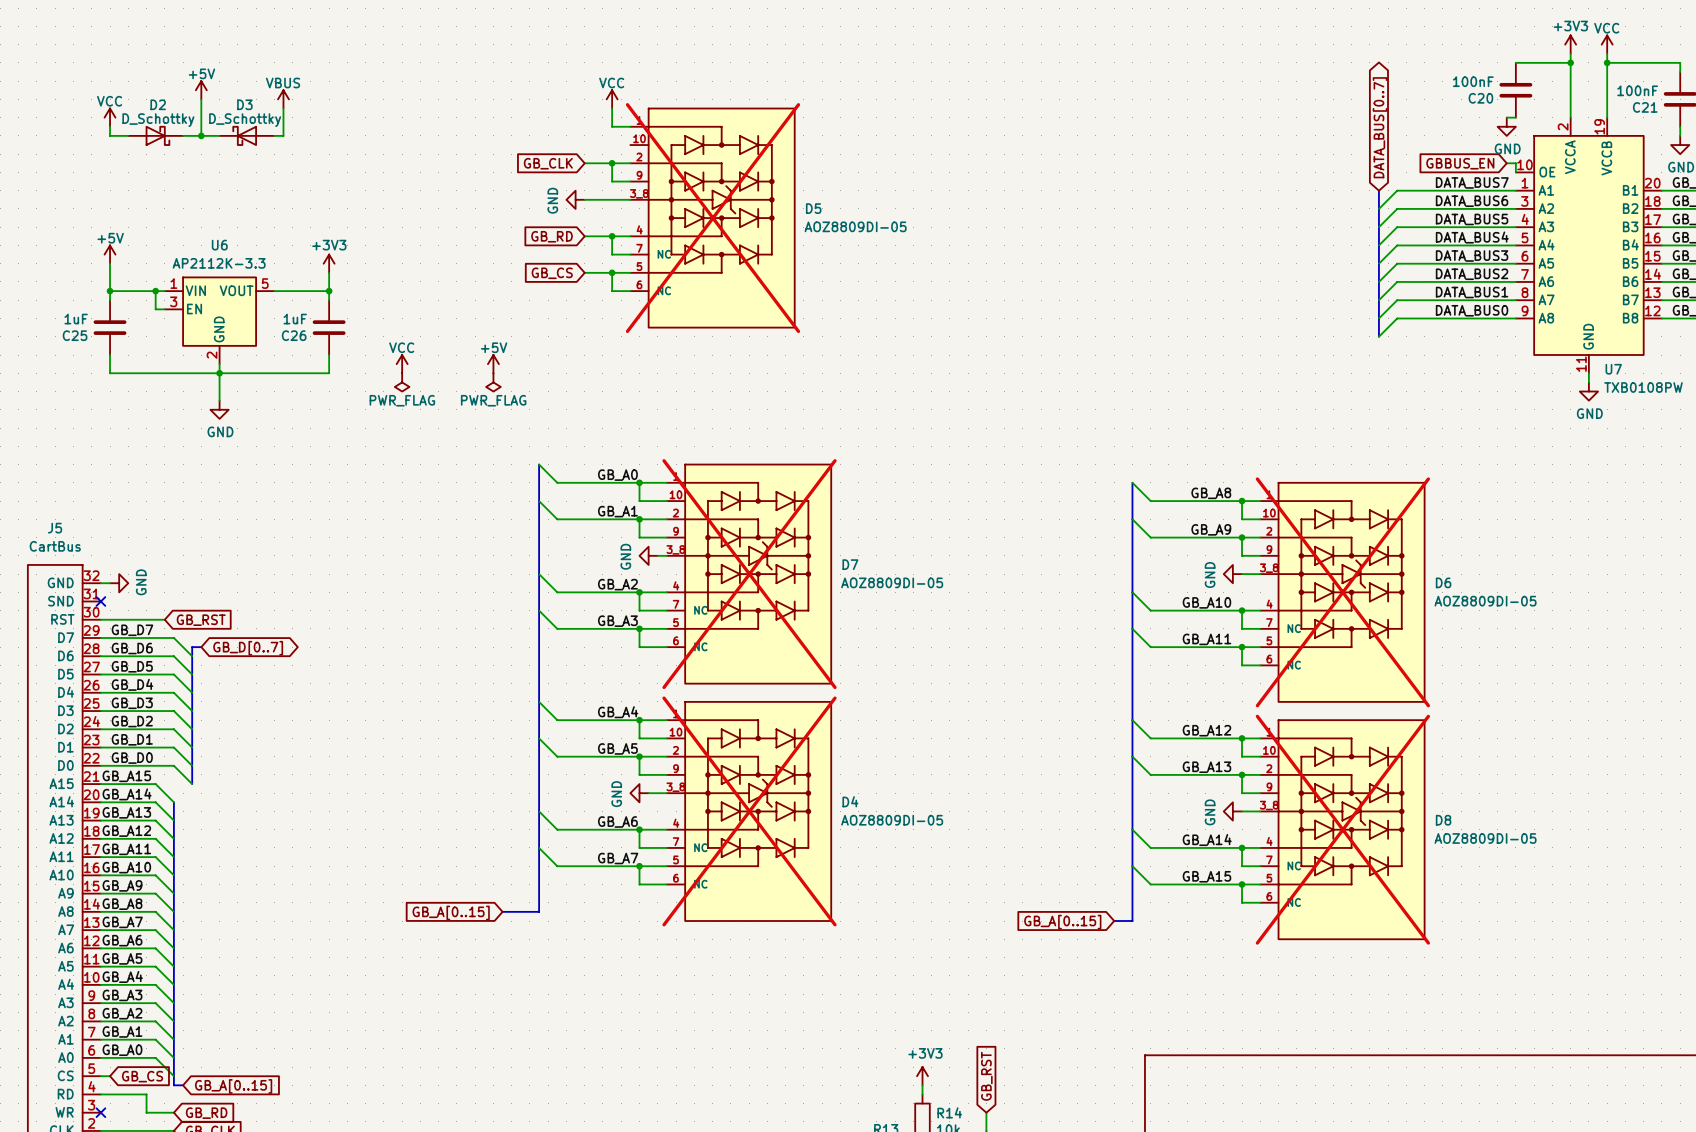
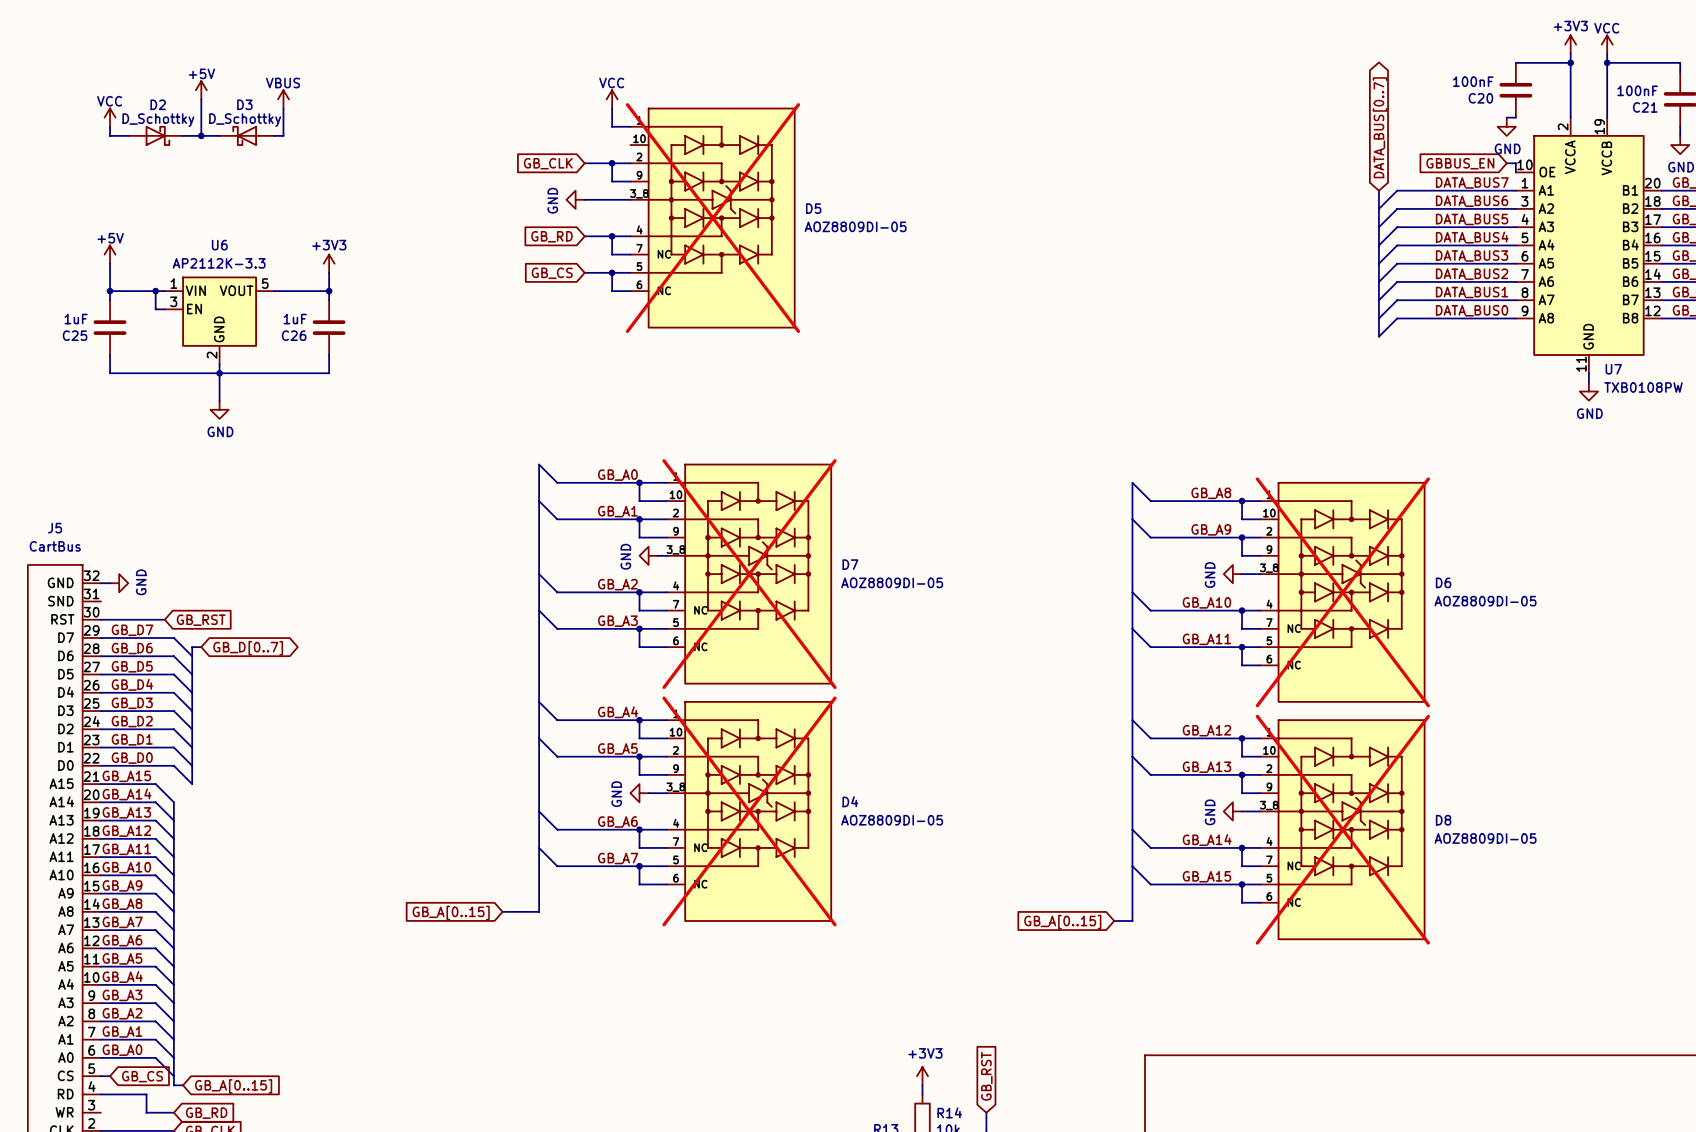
power symbol: VCC (402, 364) -> none
power symbol: +5V (493, 364) -> none
power symbol: PWR_FLAG (402, 382) -> none
power symbol: PWR_FLAG (493, 382) -> none
no-connect mark: (100, 601) -> none
no-connect mark: (100, 1112) -> none

